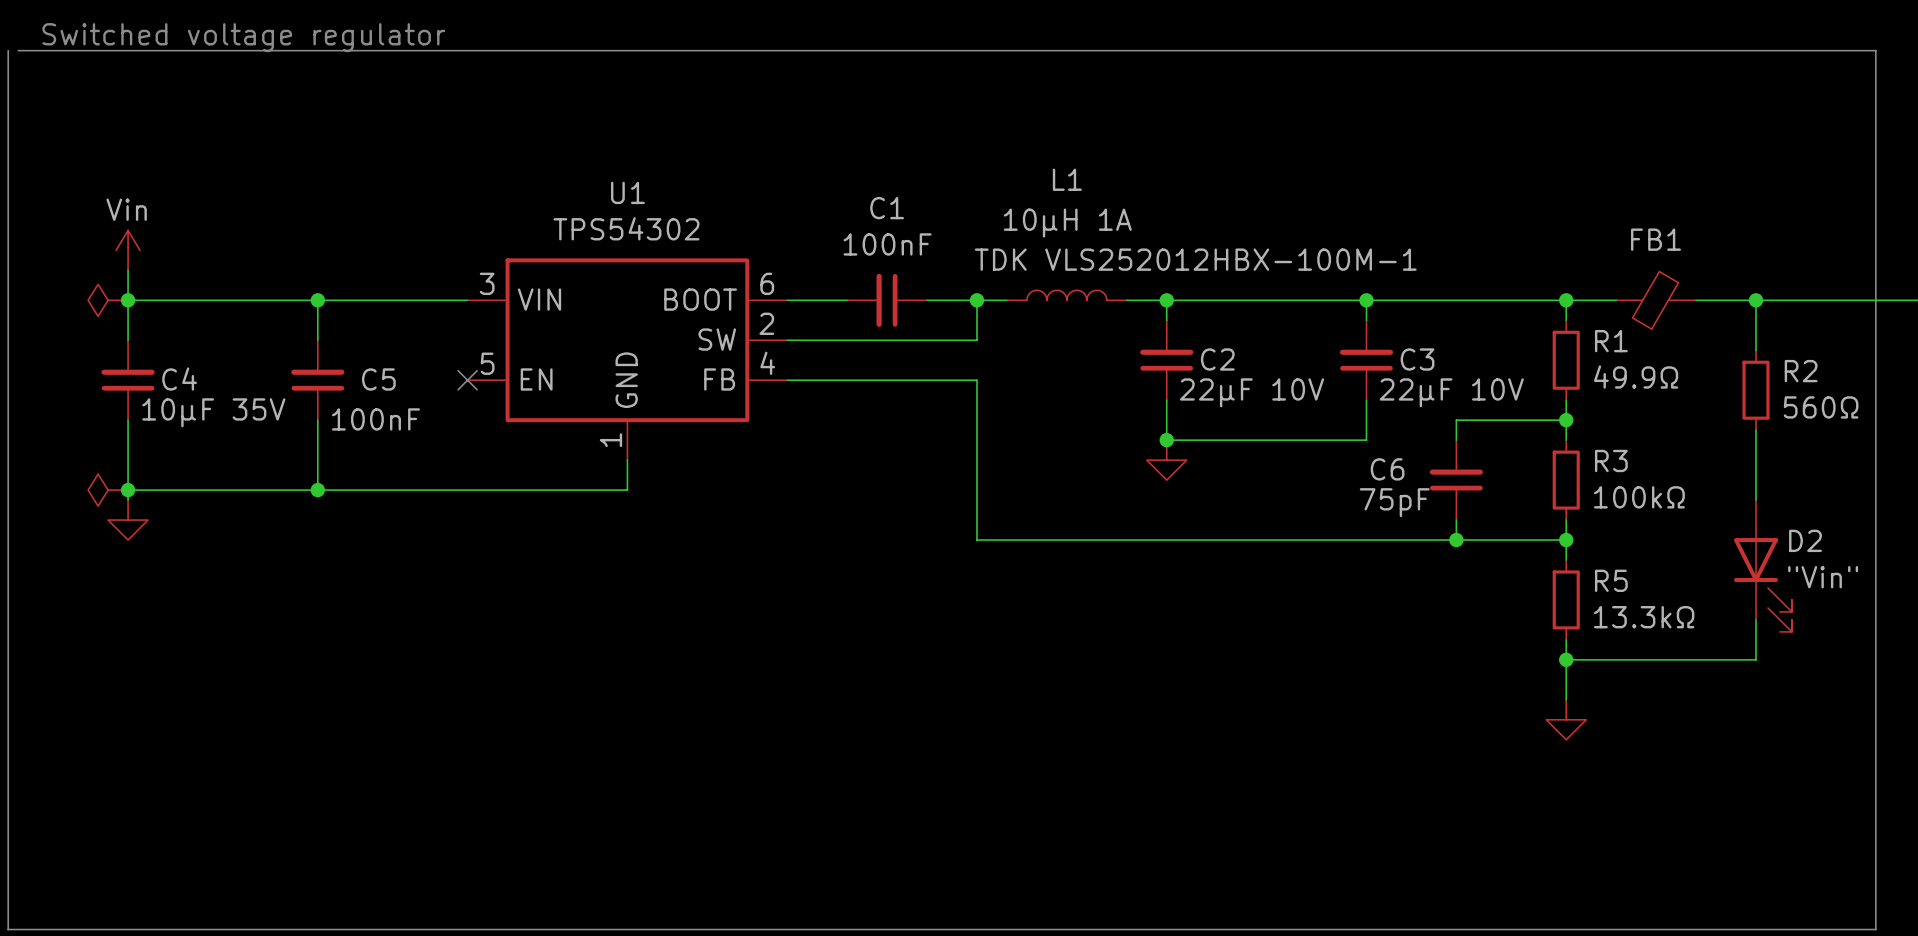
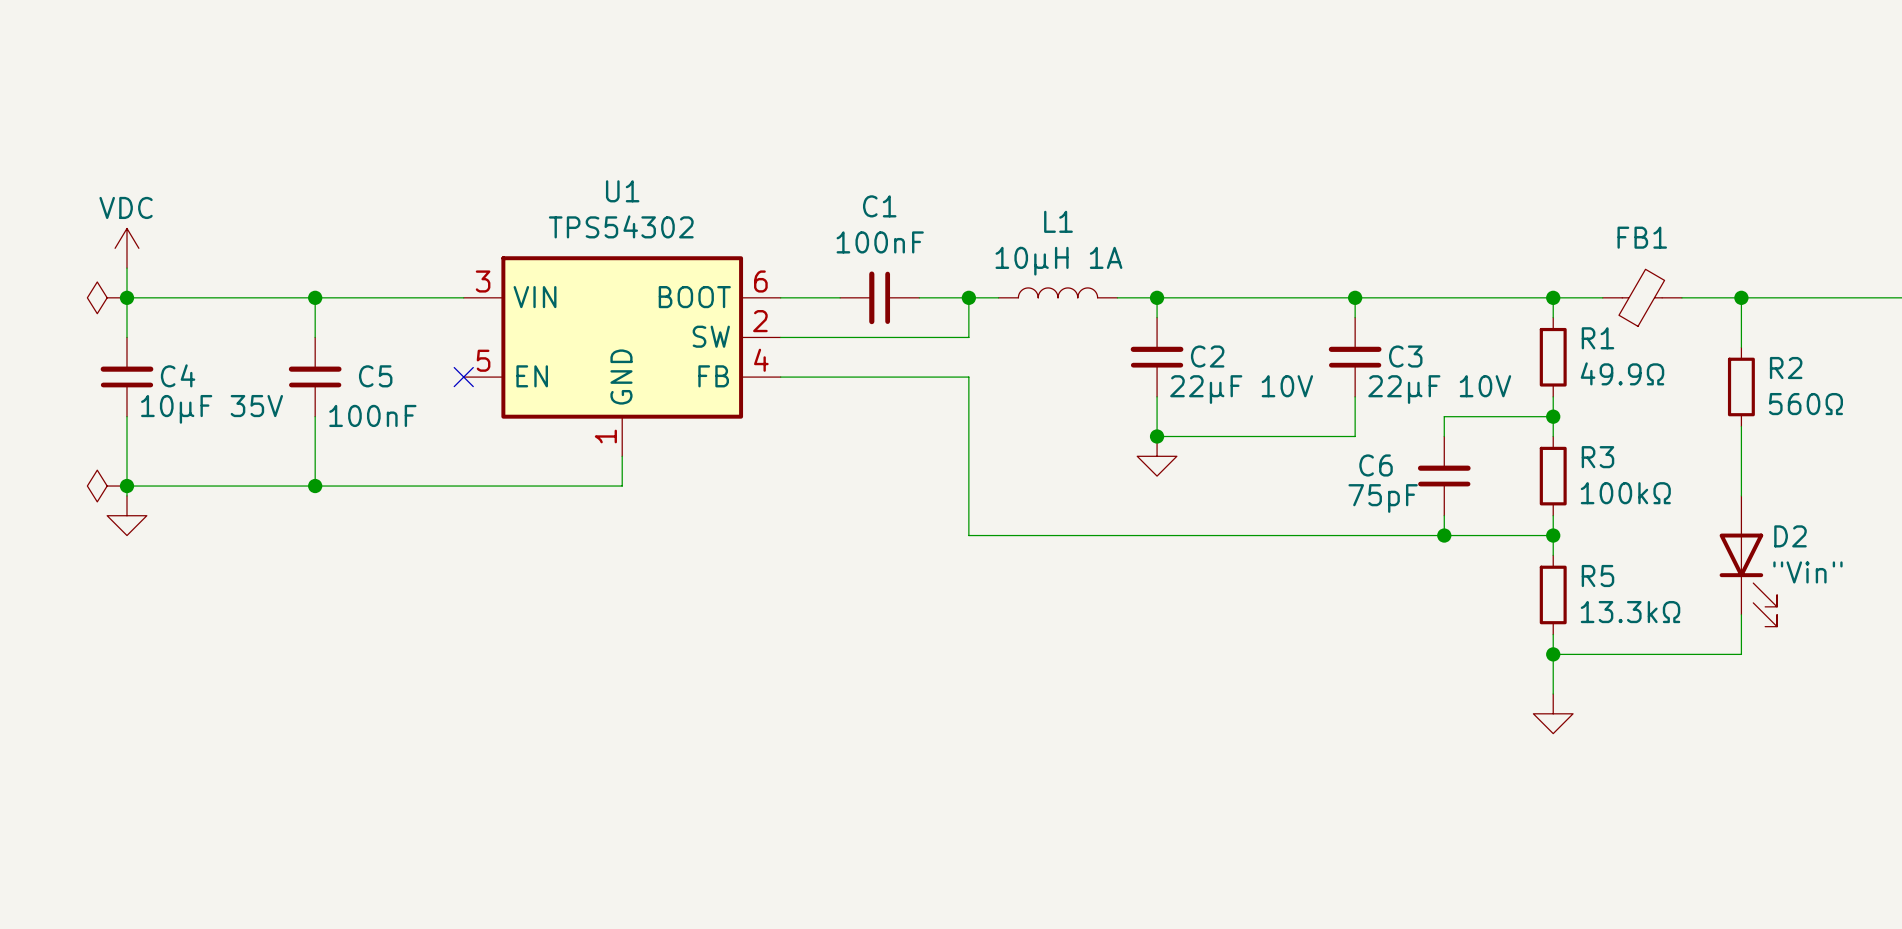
text: Switched voltage regulator (243, 37) -> none
line: (8, 50) (8, 929) (1875, 929) (1875, 50) (18, 50) -> none
L1 name position: L1 (1067, 179) -> L1 (1058, 221)
L1 value position: 10µH 1A (1067, 223) -> 10µH 1A (1058, 261)
power symbol: Vin (128, 250) -> VDC (126, 248)
L1 text: TDK VLS252012HBX-100M-1 (1195, 259) -> none

